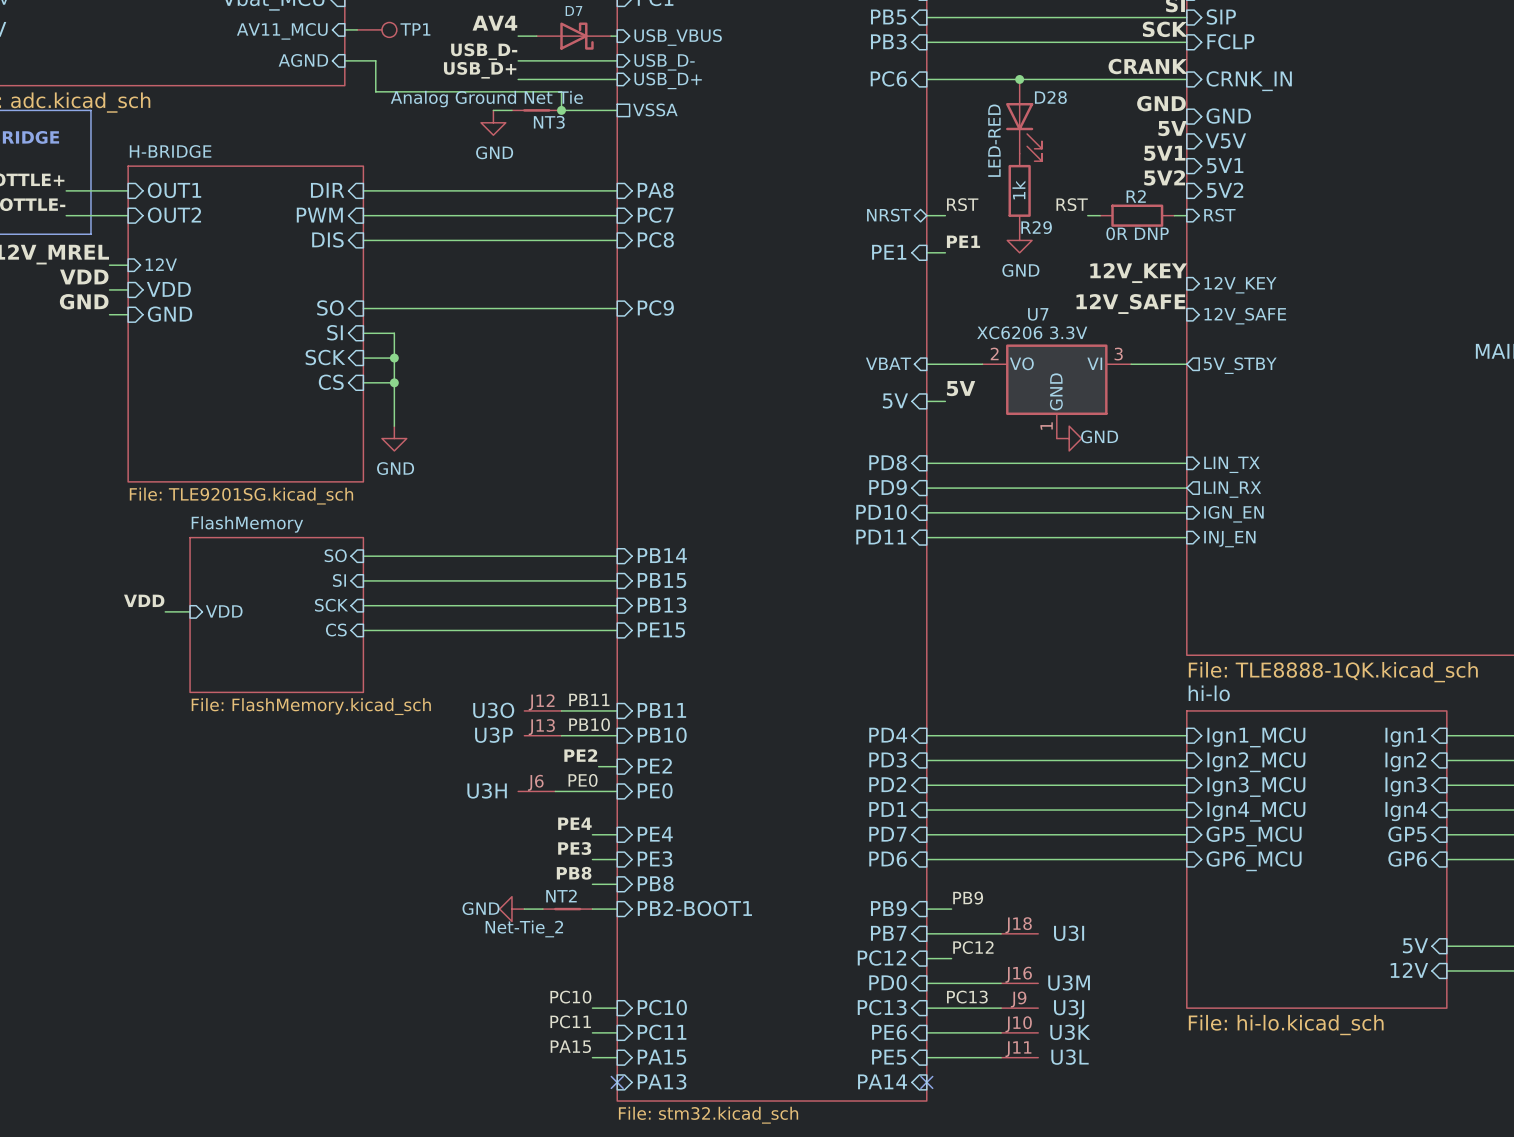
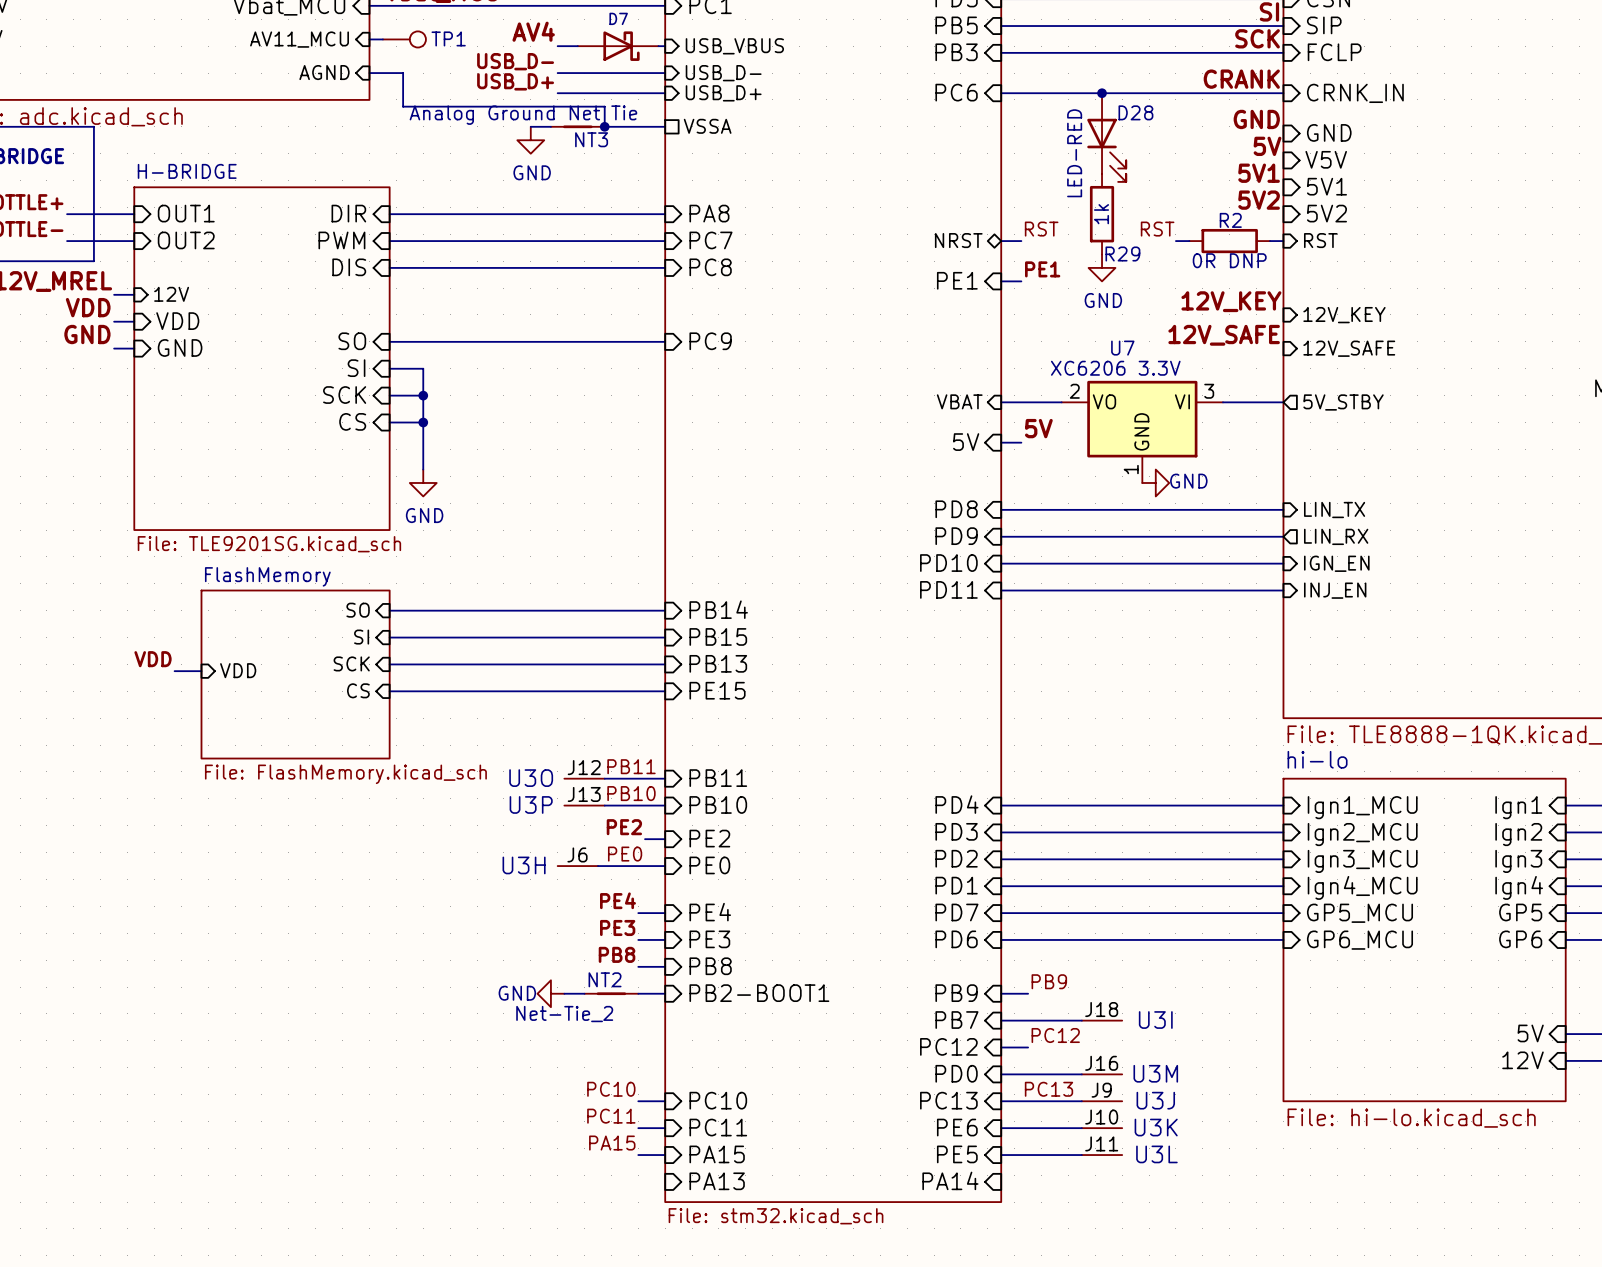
no-connect mark: (617, 1082) -> none
no-connect mark: (926, 1082) -> none

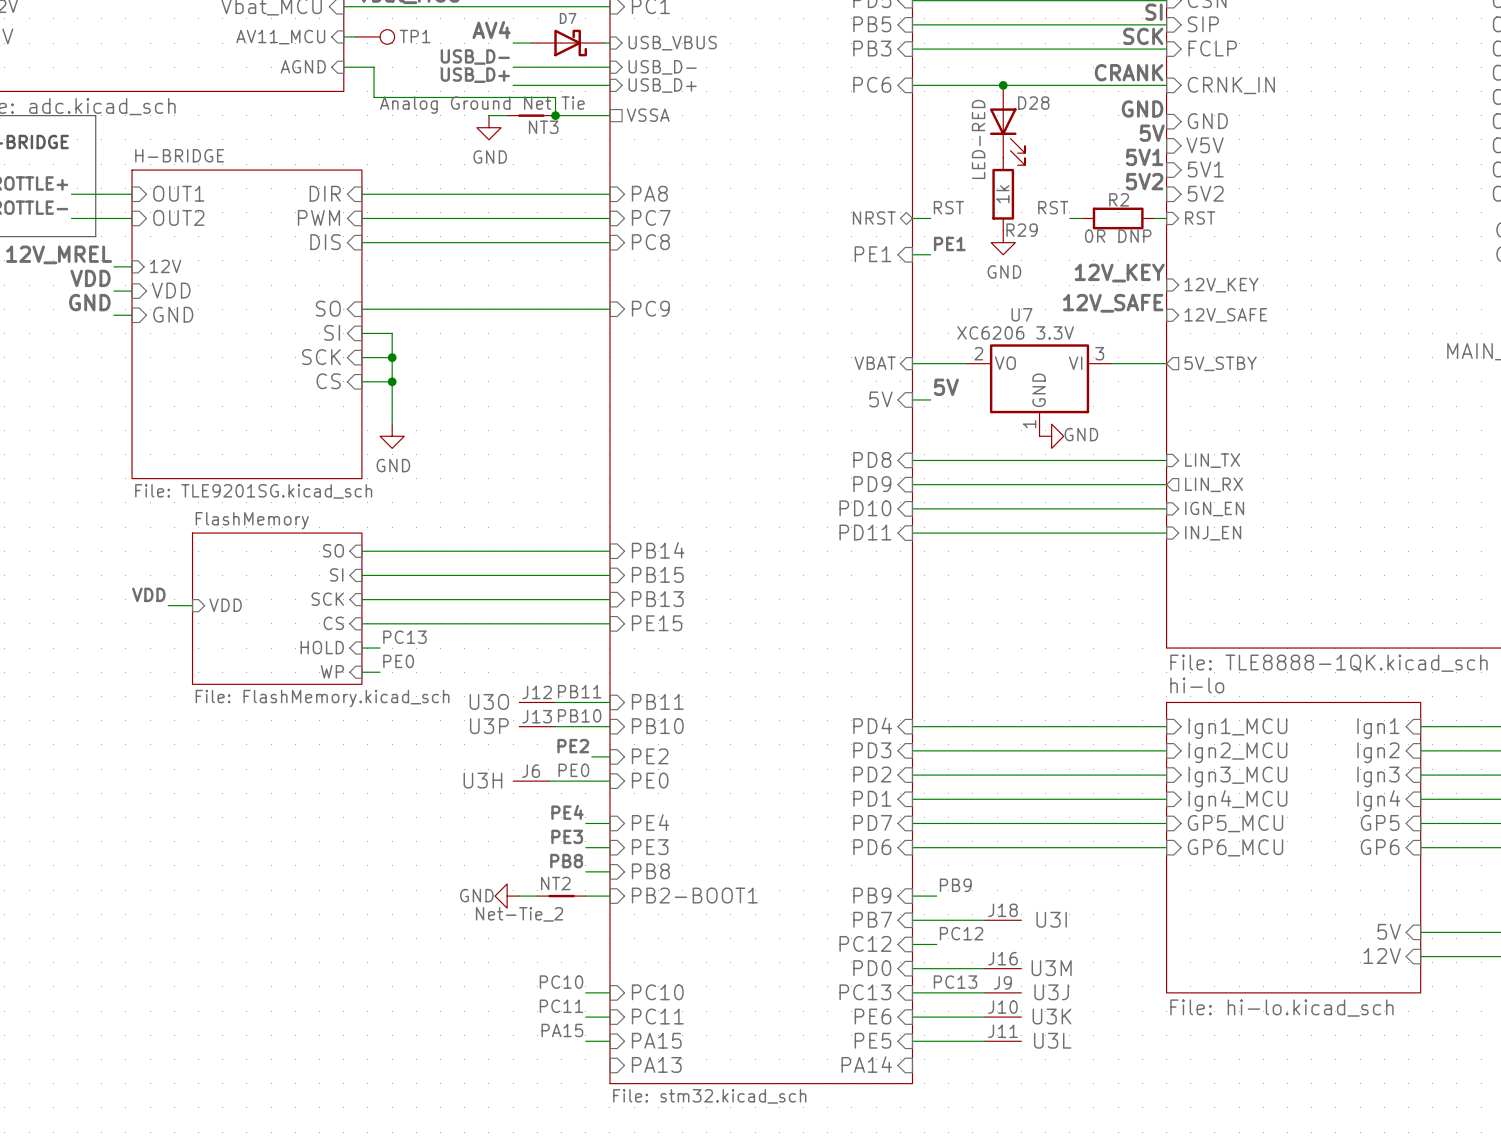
label: none -> PC13 (404, 637)
sheet pin: none -> HOLD (322, 647)
wire: none -> (361, 648) (380, 648)
label: none -> PE0 (398, 661)
sheet pin: none -> WP (332, 671)
wire: none -> (361, 672) (380, 672)

